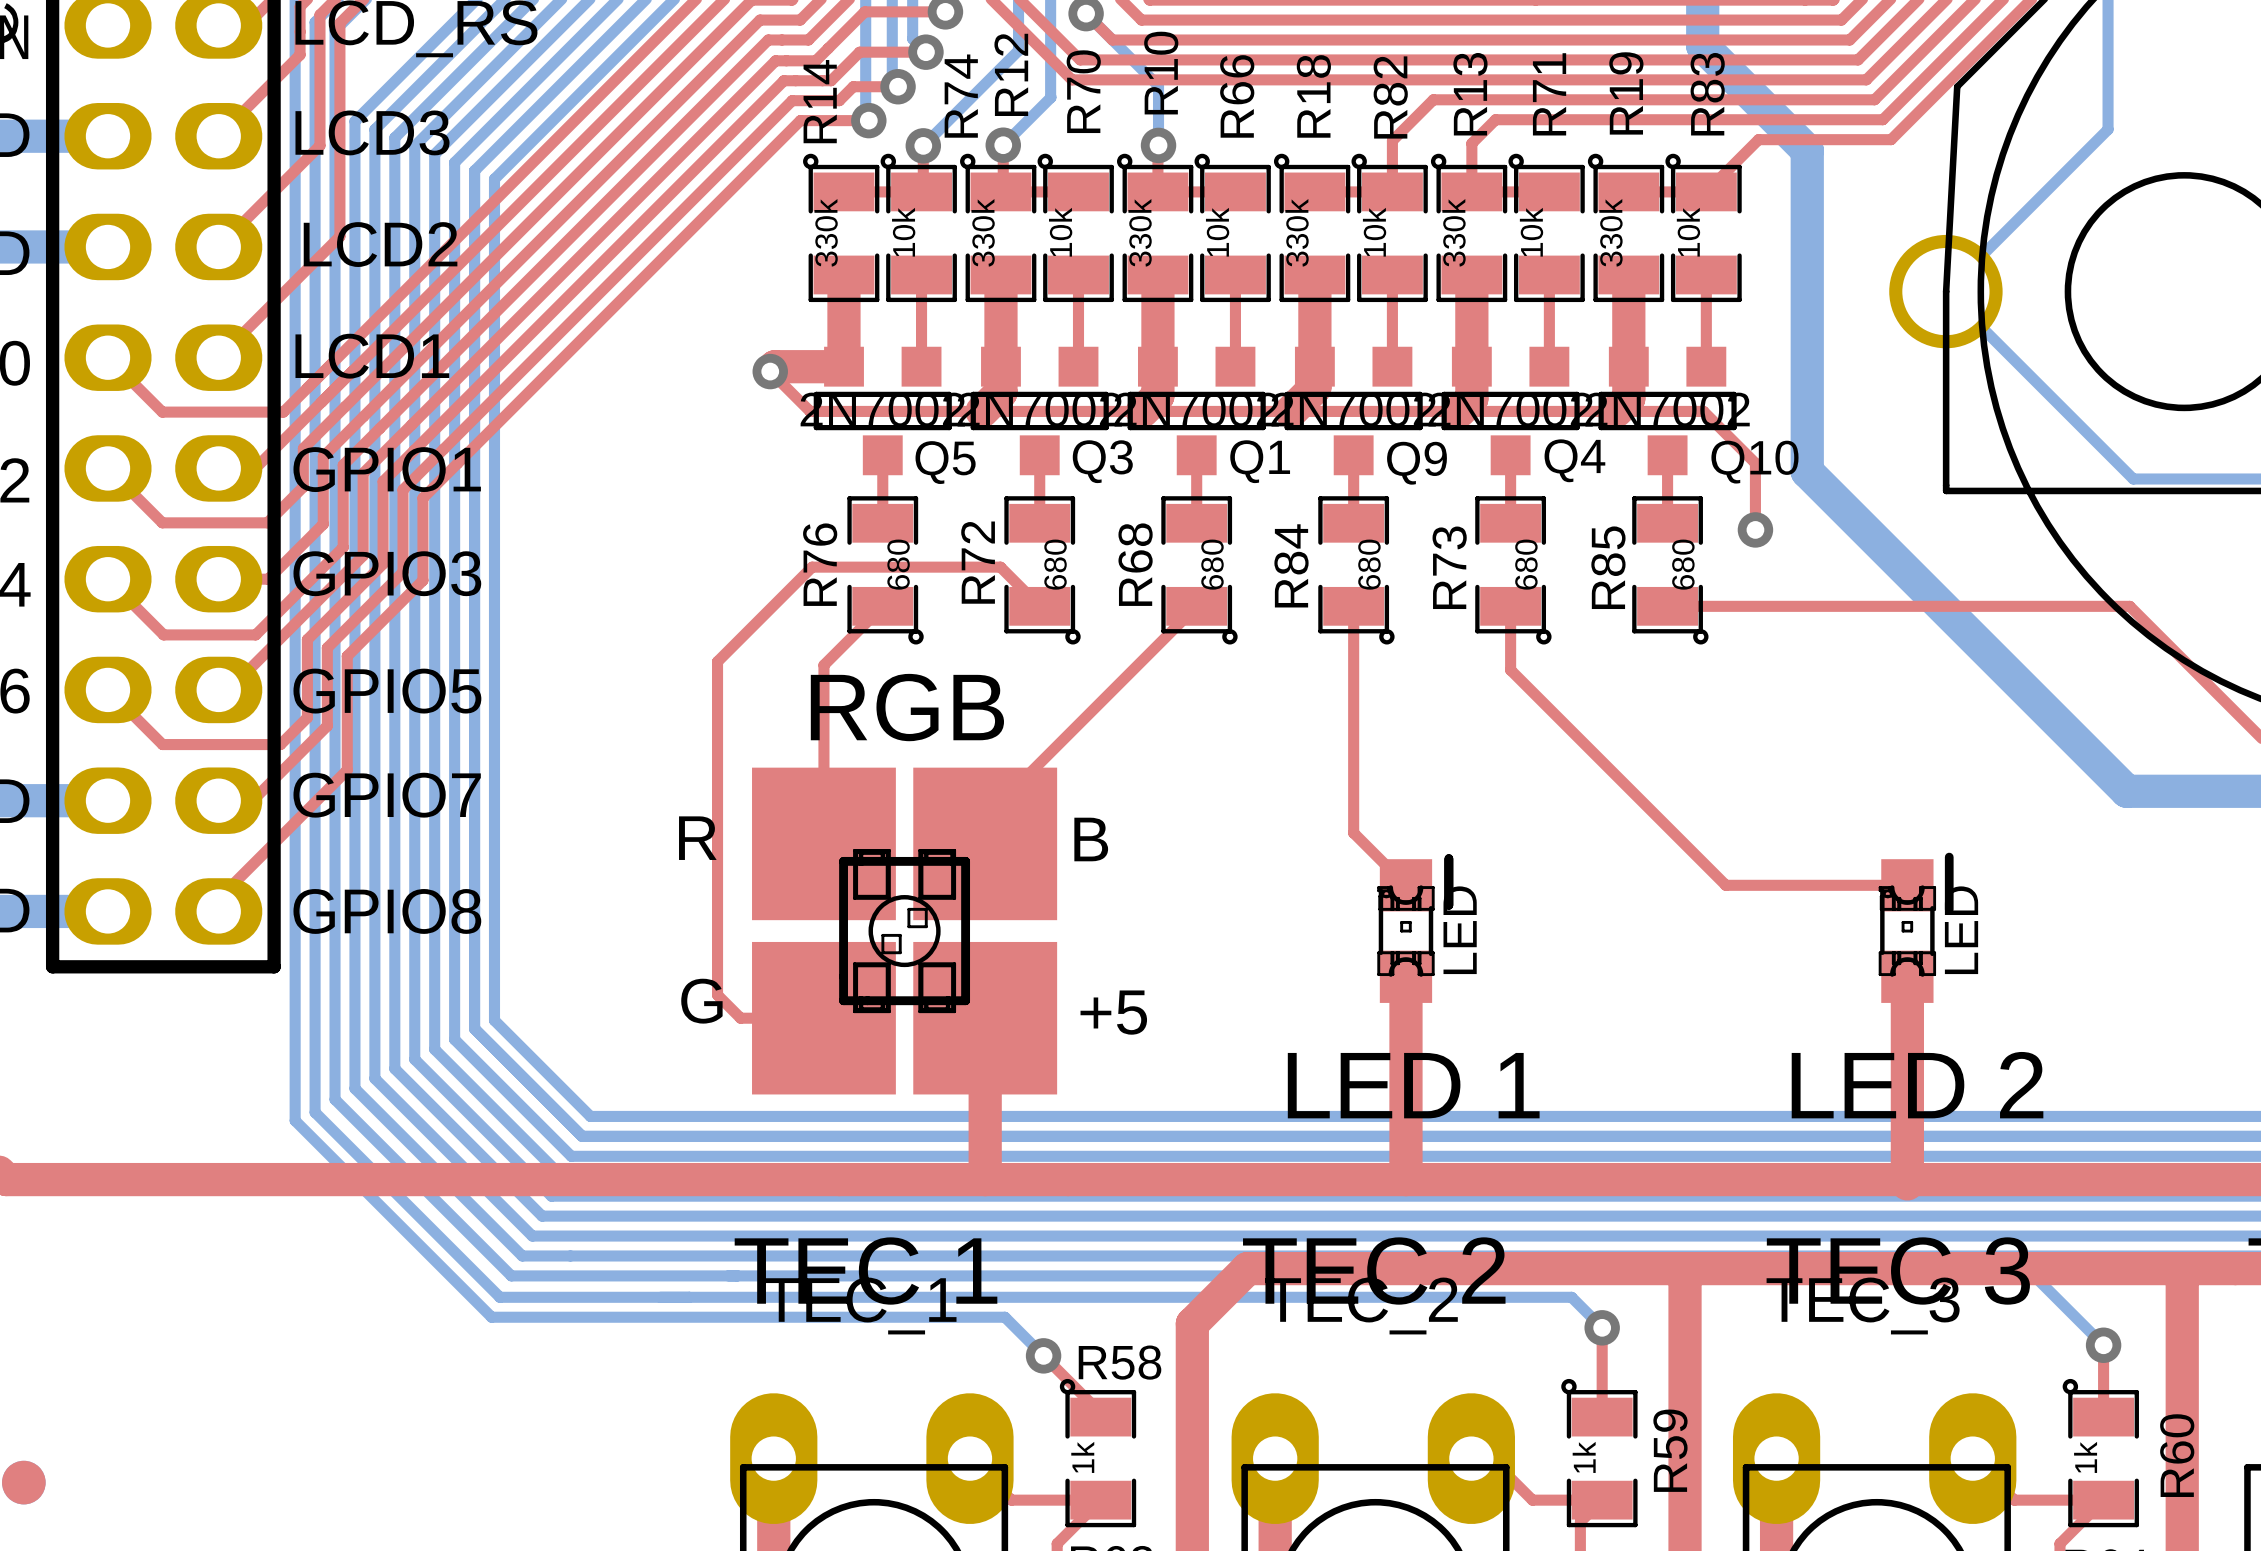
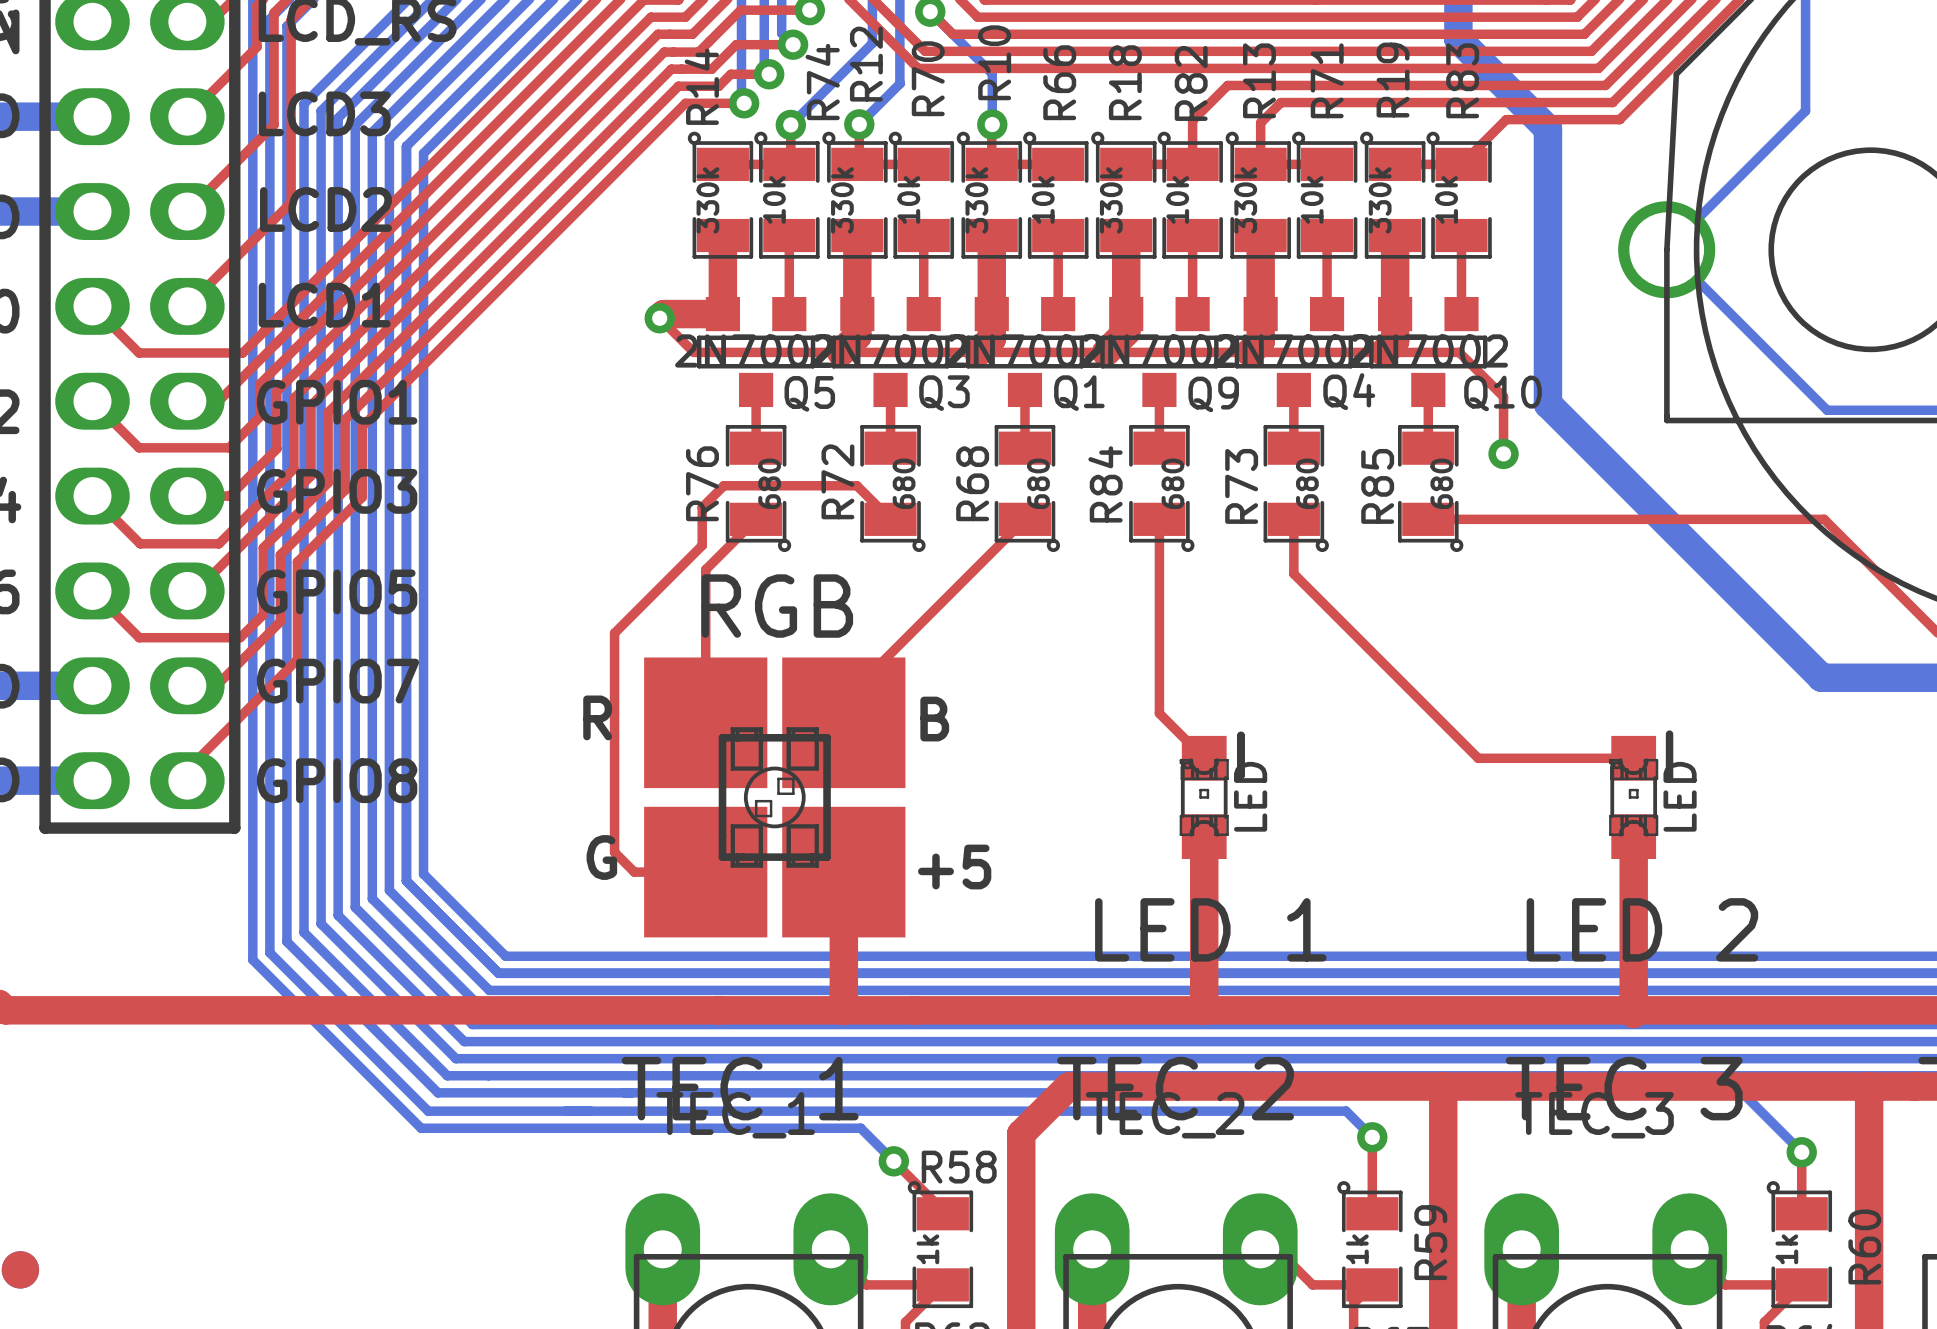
top track: (845, 567) (812, 567) (717, 661) (717, 739) -> (723, 485) (702, 507) (702, 545) (614, 633)

